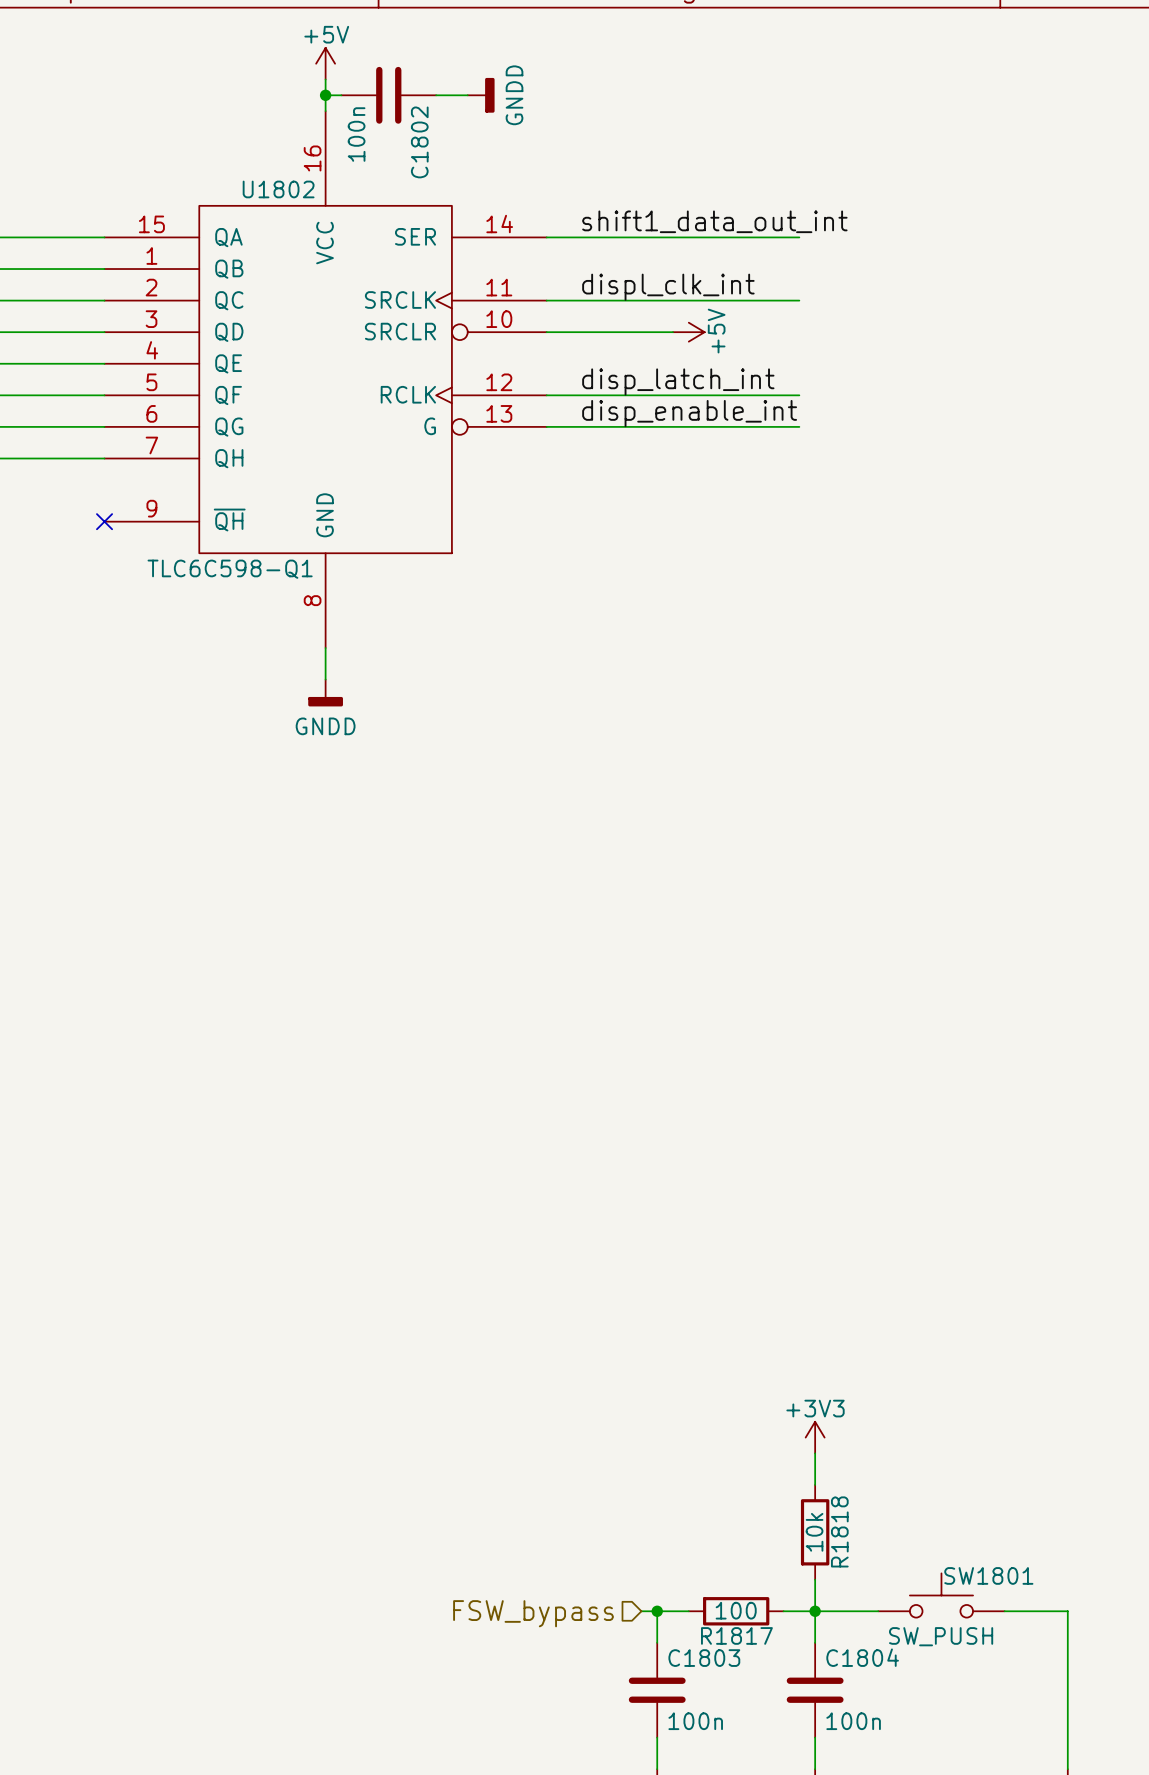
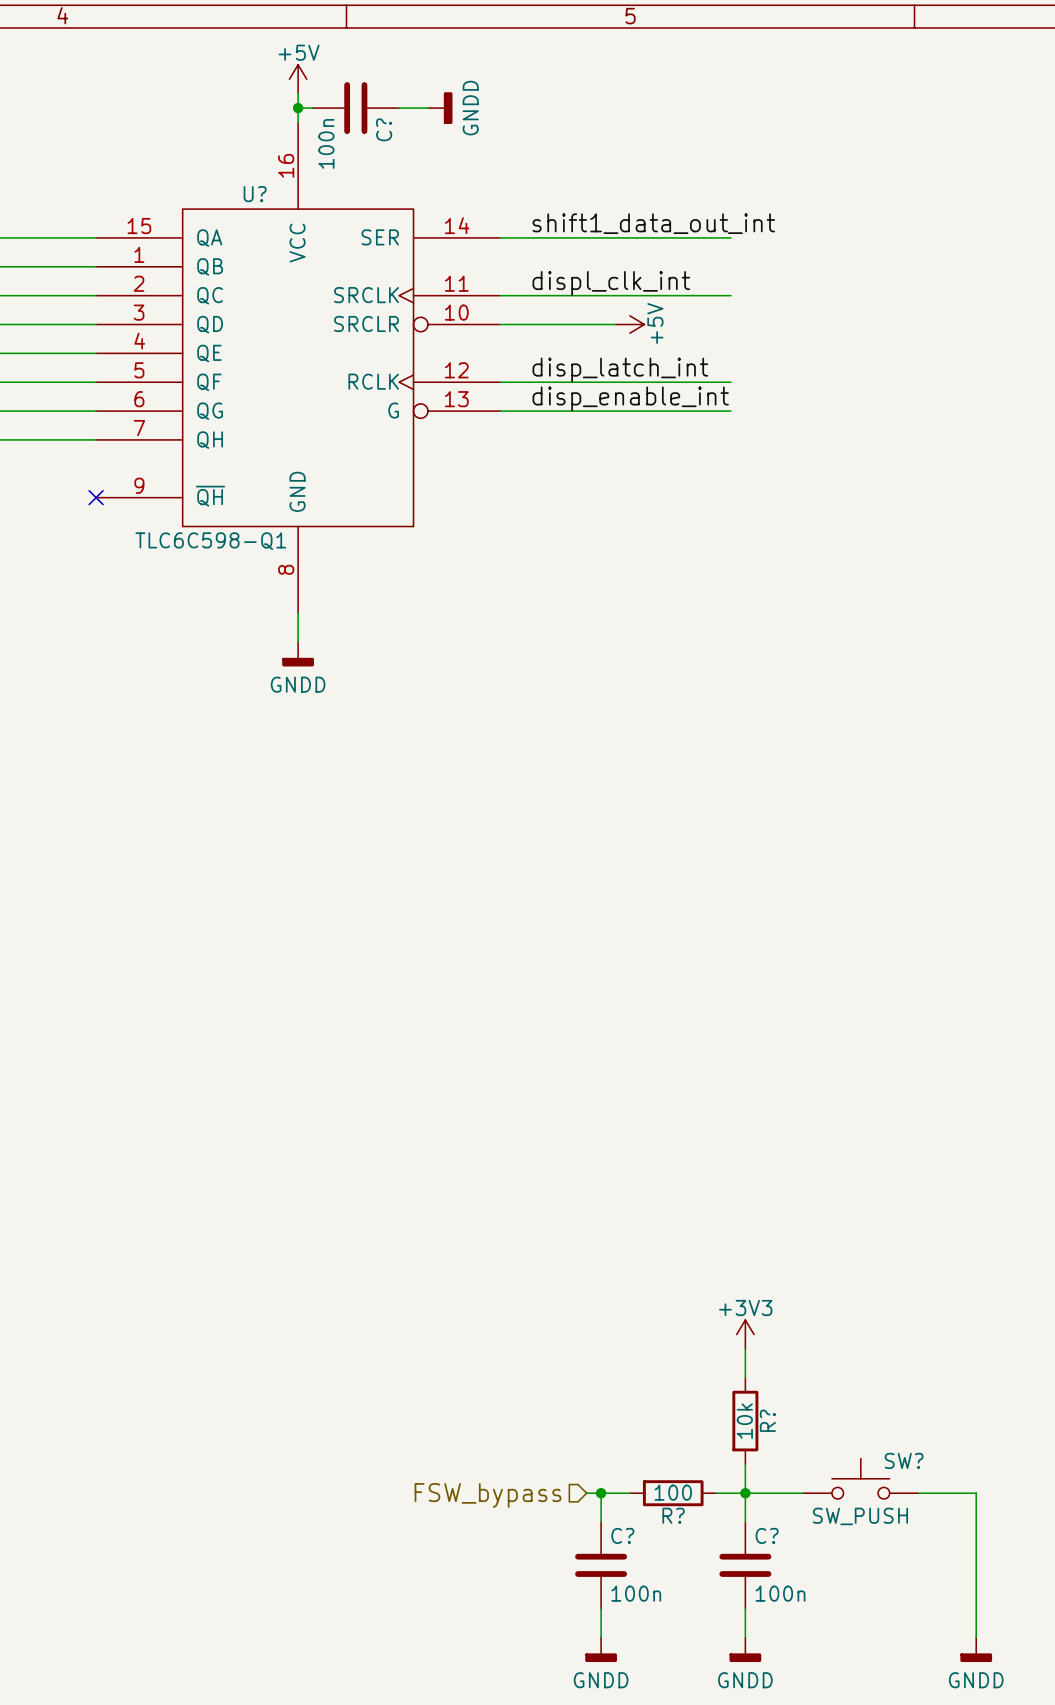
C1802 name: C1802 (419, 142) -> C? (384, 129)
U1802 name: U1802 (278, 189) -> U? (255, 194)
R1818 name: R1818 (839, 1531) -> R? (767, 1420)
SW1801 name: SW1801 (988, 1575) -> SW? (904, 1460)
R1817 name: R1817 (736, 1635) -> R? (673, 1515)
C1804 name: C1804 (862, 1657) -> C? (767, 1535)
C1803 name: C1803 (704, 1658) -> C? (622, 1535)

